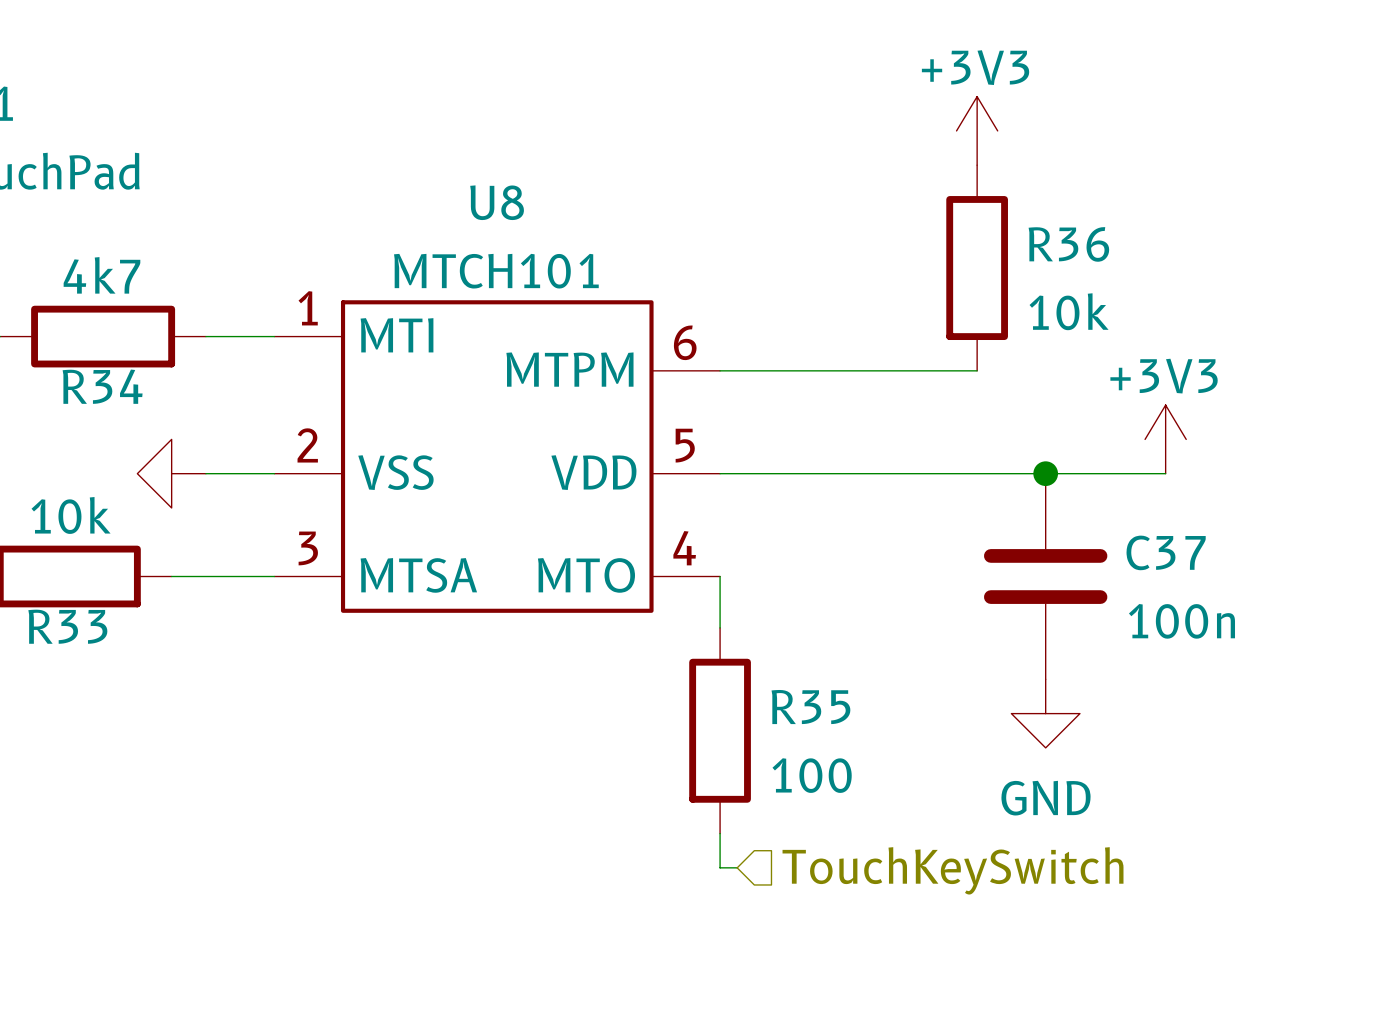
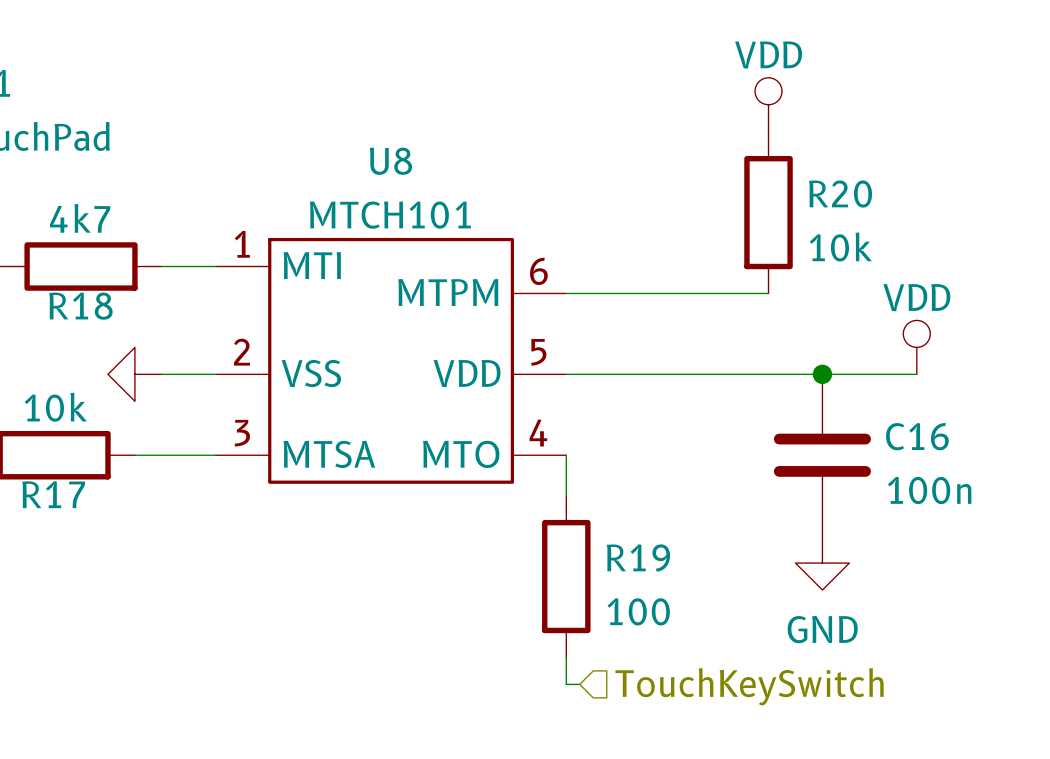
power symbol: +3V3 (977, 130) -> VDD (768, 104)
R36 name: R36 (1068, 244) -> R20 (840, 194)
R34 name: R34 (102, 386) -> R18 (80, 306)
power symbol: +3V3 (1165, 439) -> VDD (916, 347)
C37 name: C37 (1166, 552) -> C16 (917, 436)
R33 name: R33 (67, 626) -> R17 (53, 494)
R35 name: R35 (810, 707) -> R19 (638, 557)

